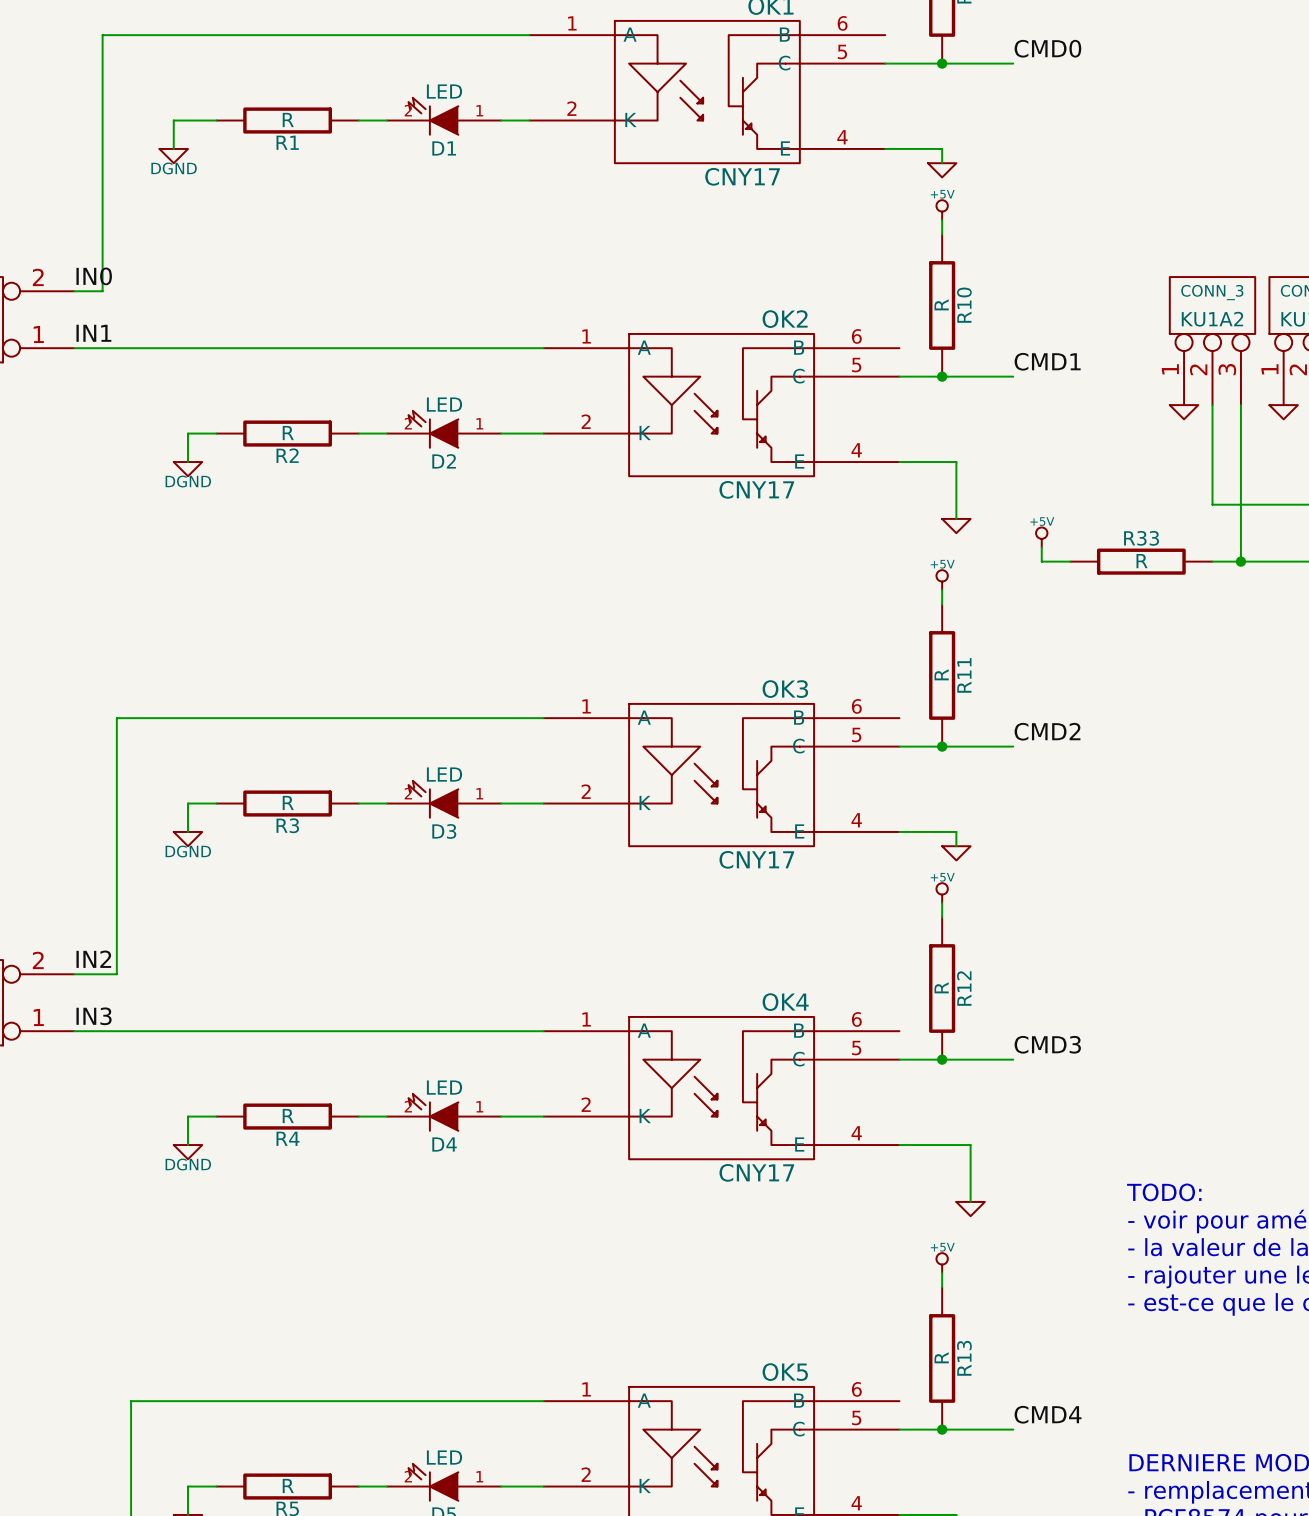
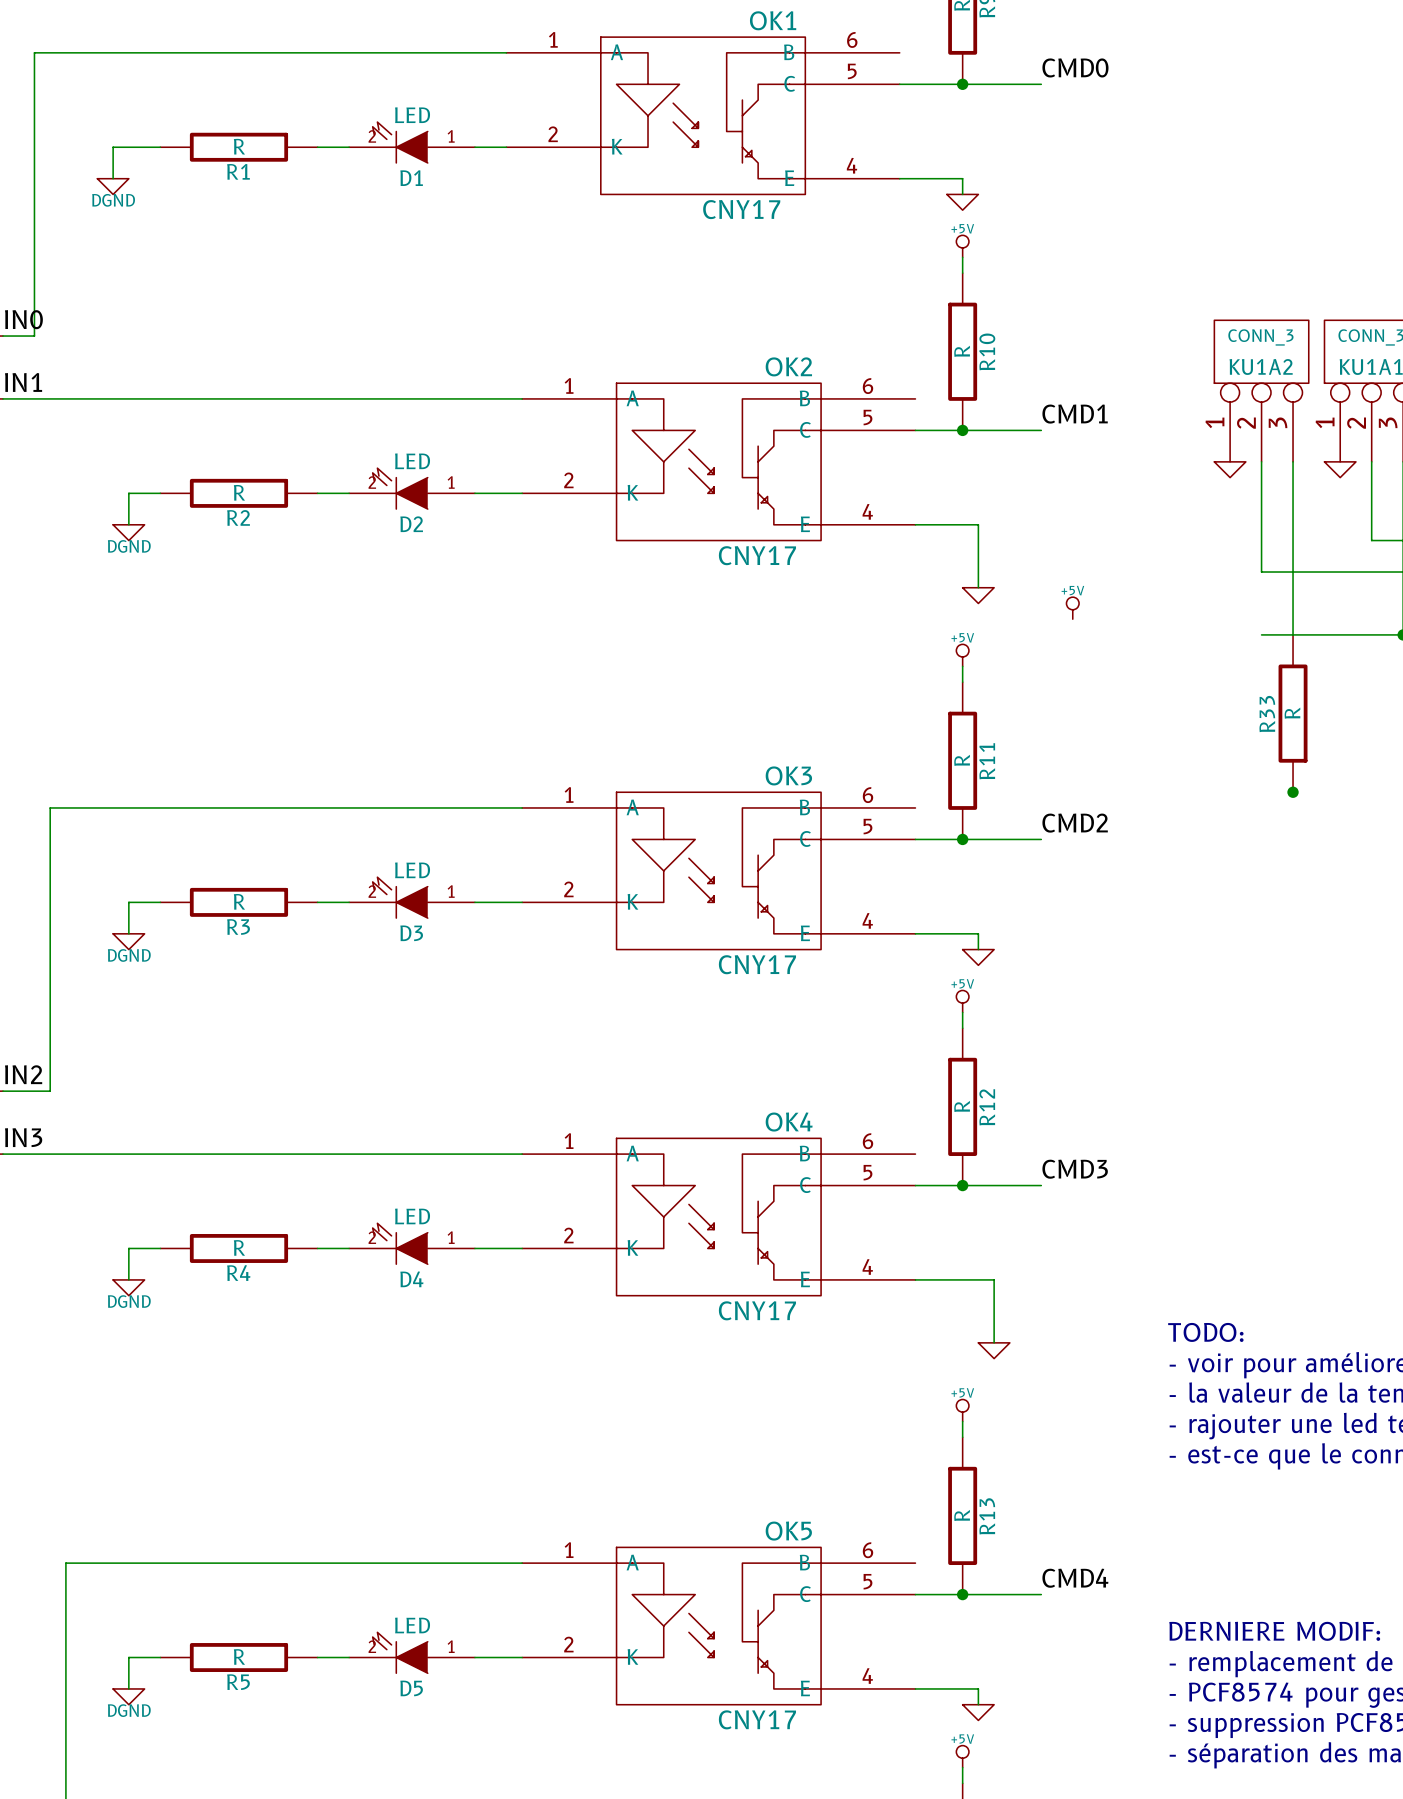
R33 name position: R33 (1141, 538) -> R33 (1267, 714)
wire: (1041, 547) (1041, 561) (1070, 561) -> none
R33 rotation: 0° (1141, 561) -> 90° clockwise (1293, 713)
R33 position: (1141, 561) -> (1293, 713)
junction: (1240, 561) -> none
junction: none -> (1293, 792)

